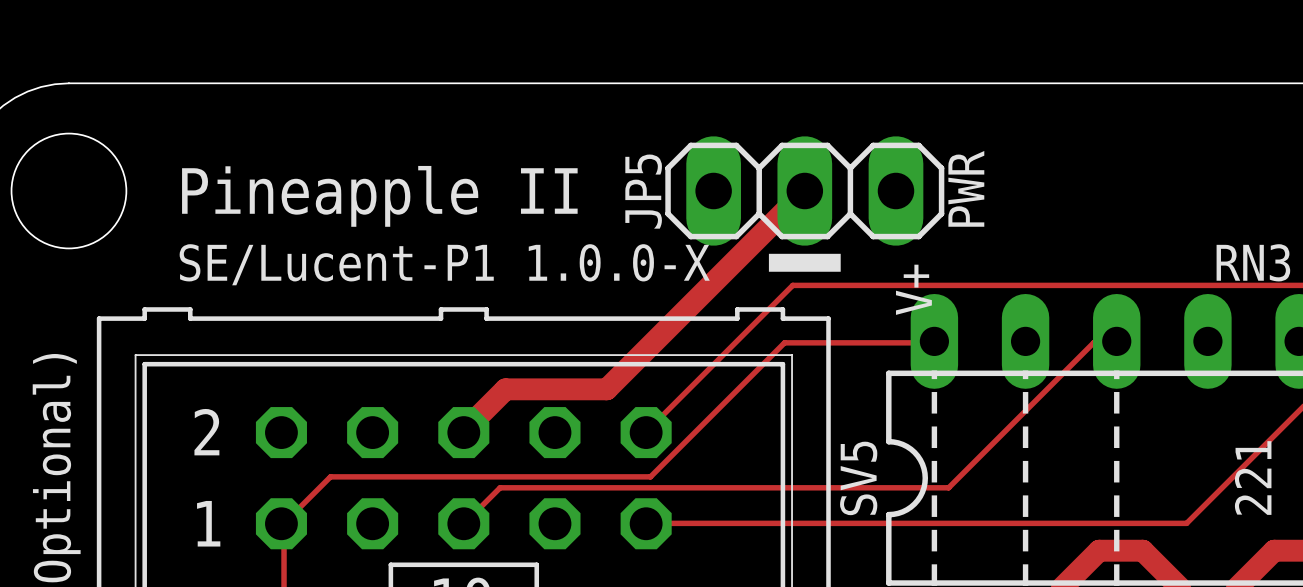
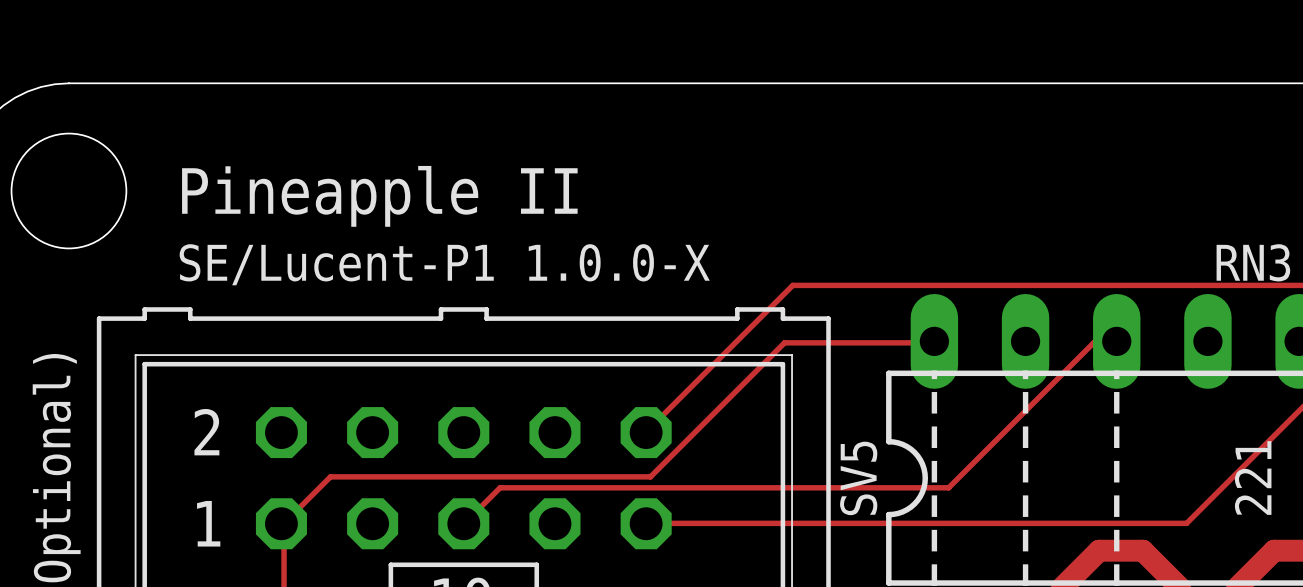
text: PWR (966, 188) -> none
track: (804, 191) (606, 389) (505, 389) (463, 432) -> none
JP5: (804, 191) -> none
drawing: [768, 253, 841, 272] -> none
text: V+ (913, 289) -> none

